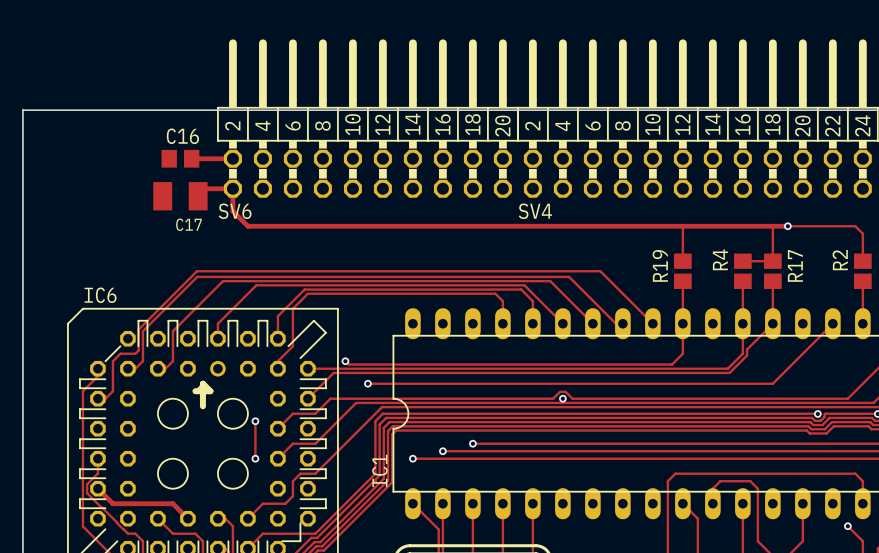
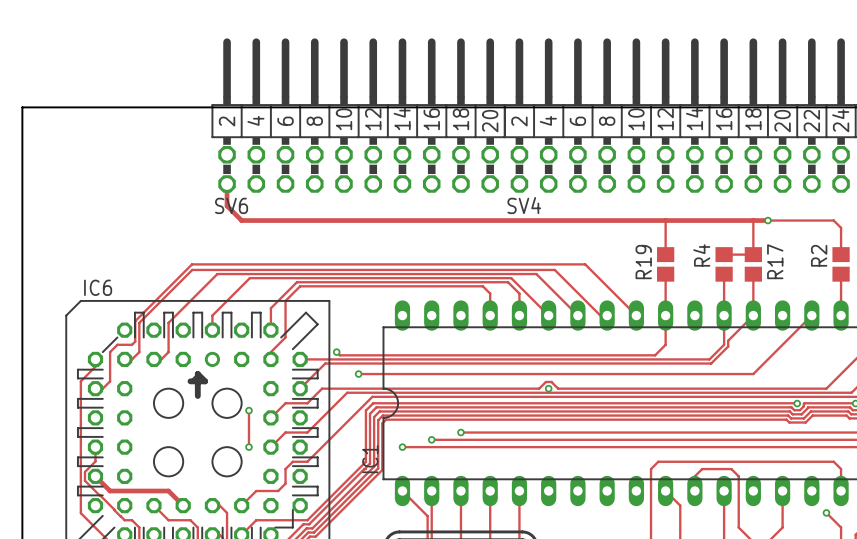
C16: (180, 158) -> none
track: (191, 158) (232, 158) -> none
track: (232, 188) (202, 188) (198, 196) -> none
C17: (180, 196) -> none

